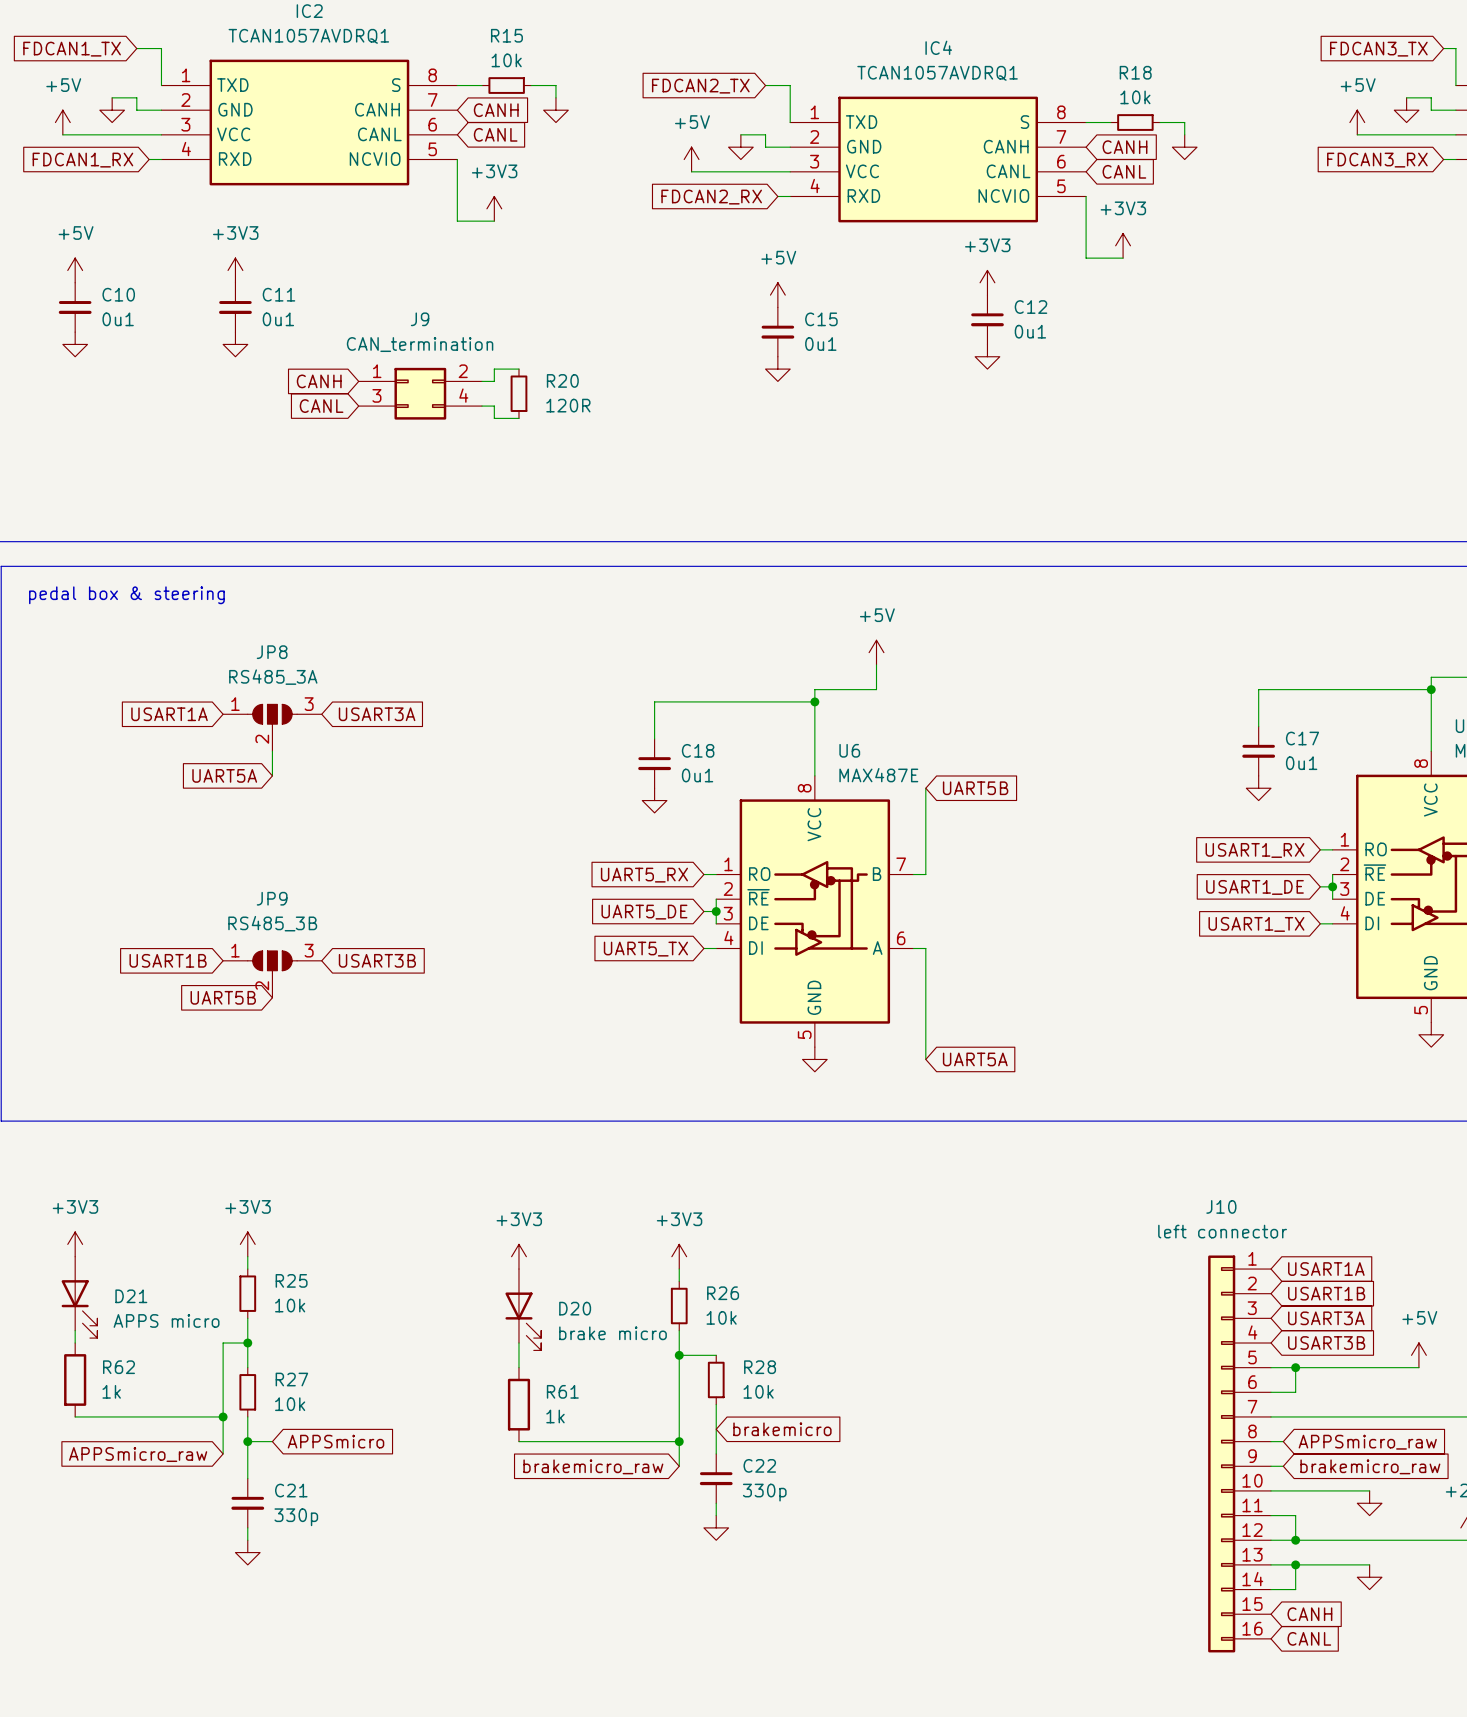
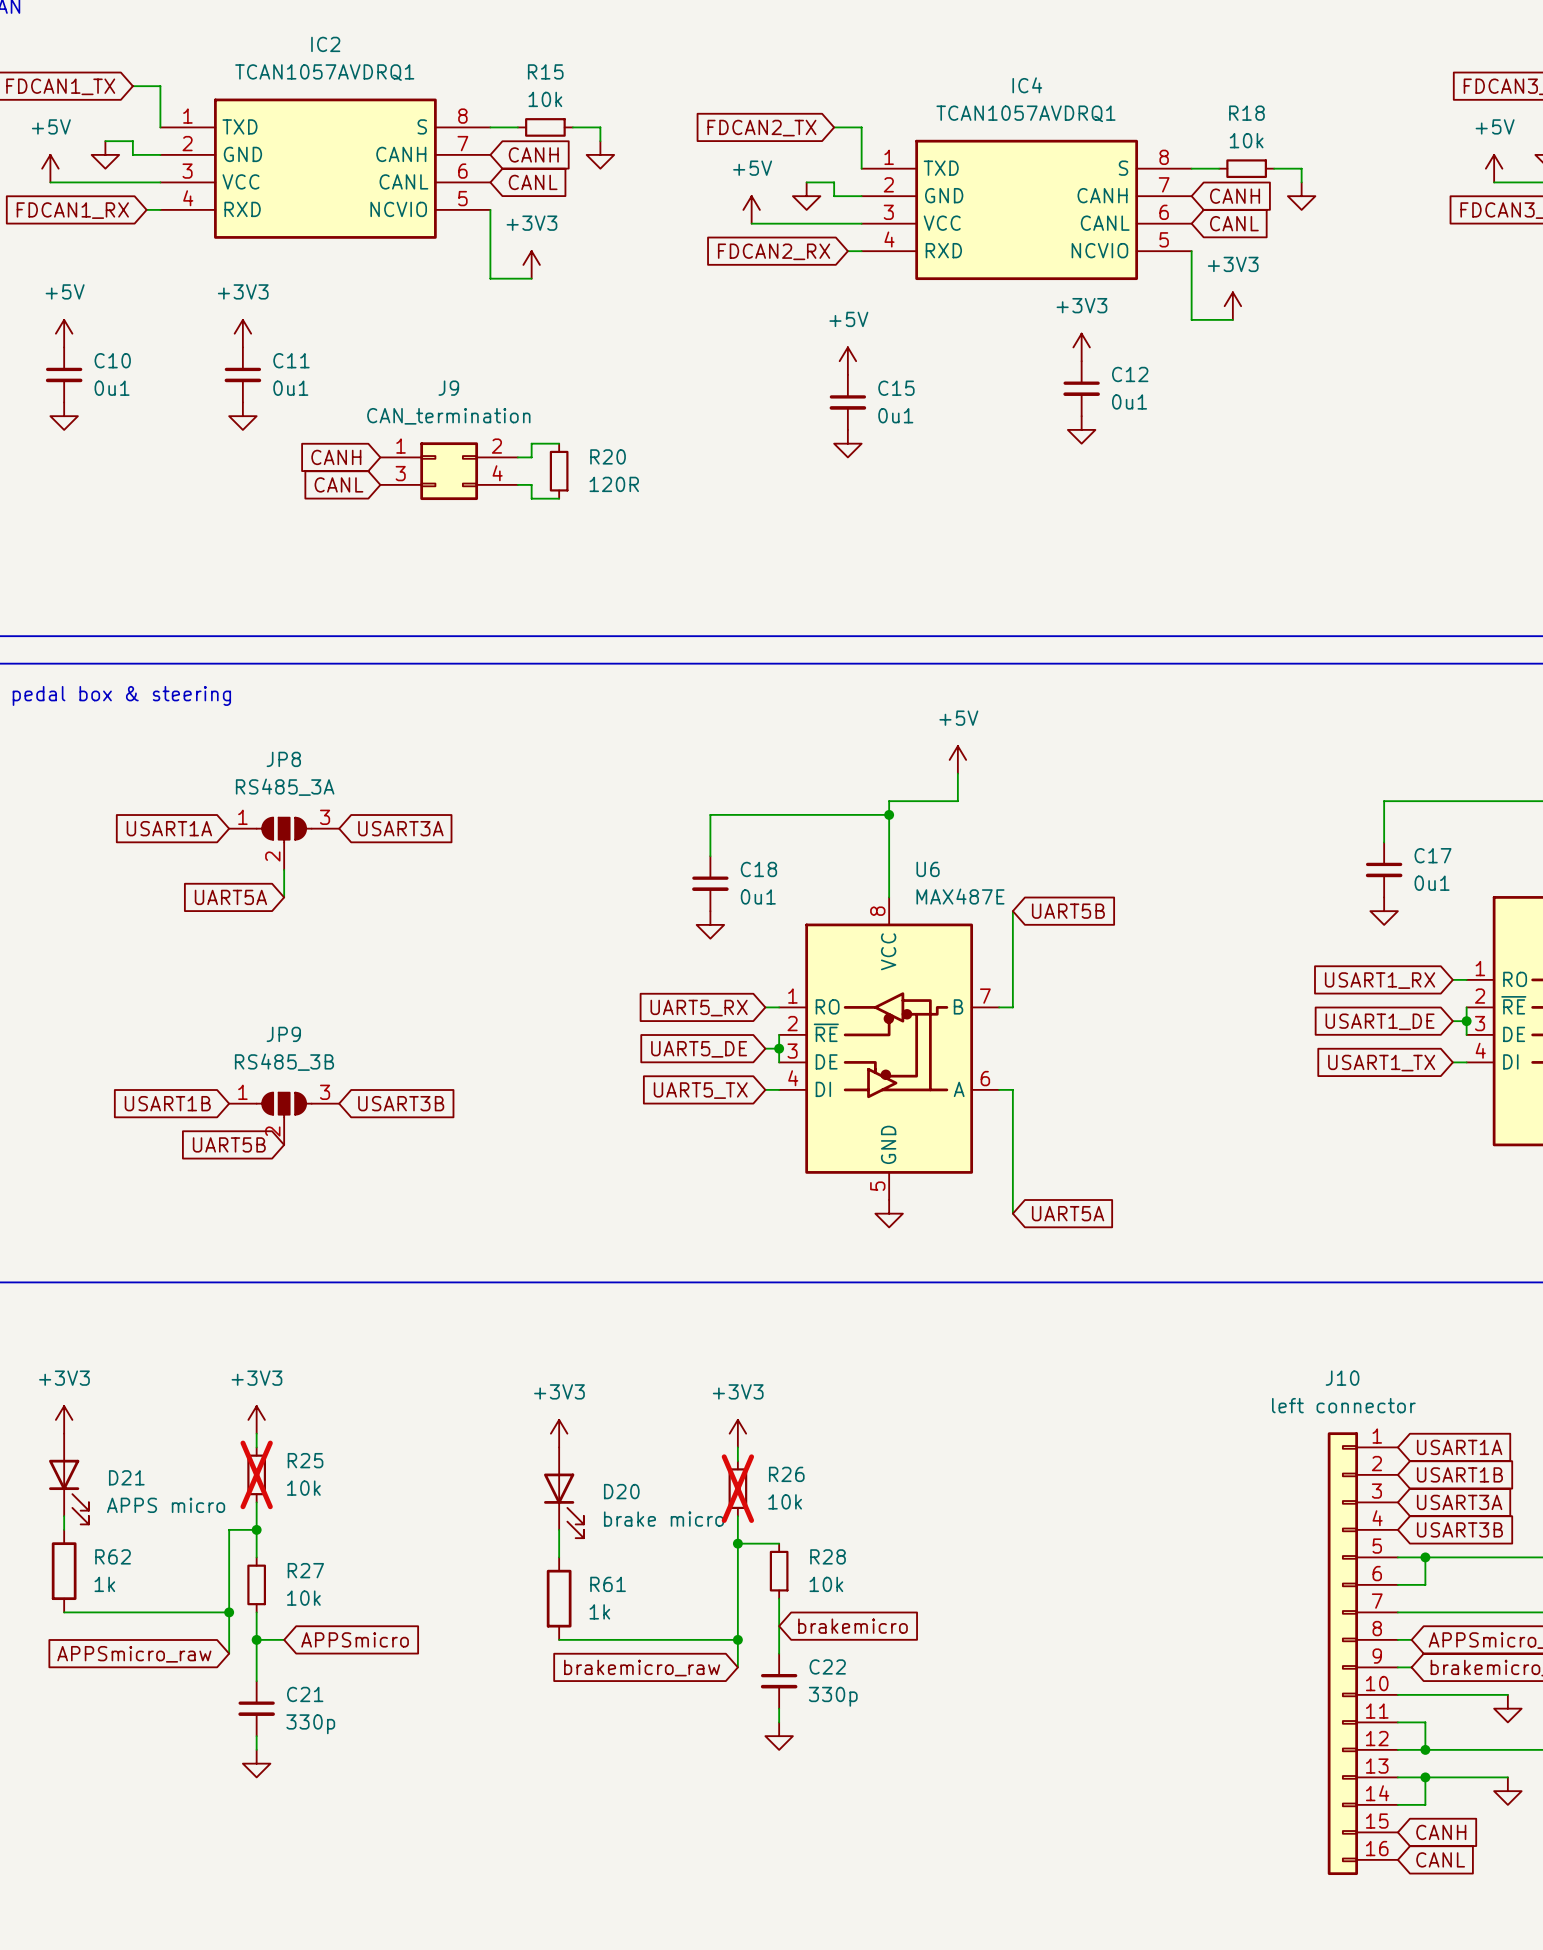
R25 do-not-place cross: none -> (256, 1474)
R26 do-not-place cross: none -> (737, 1488)

